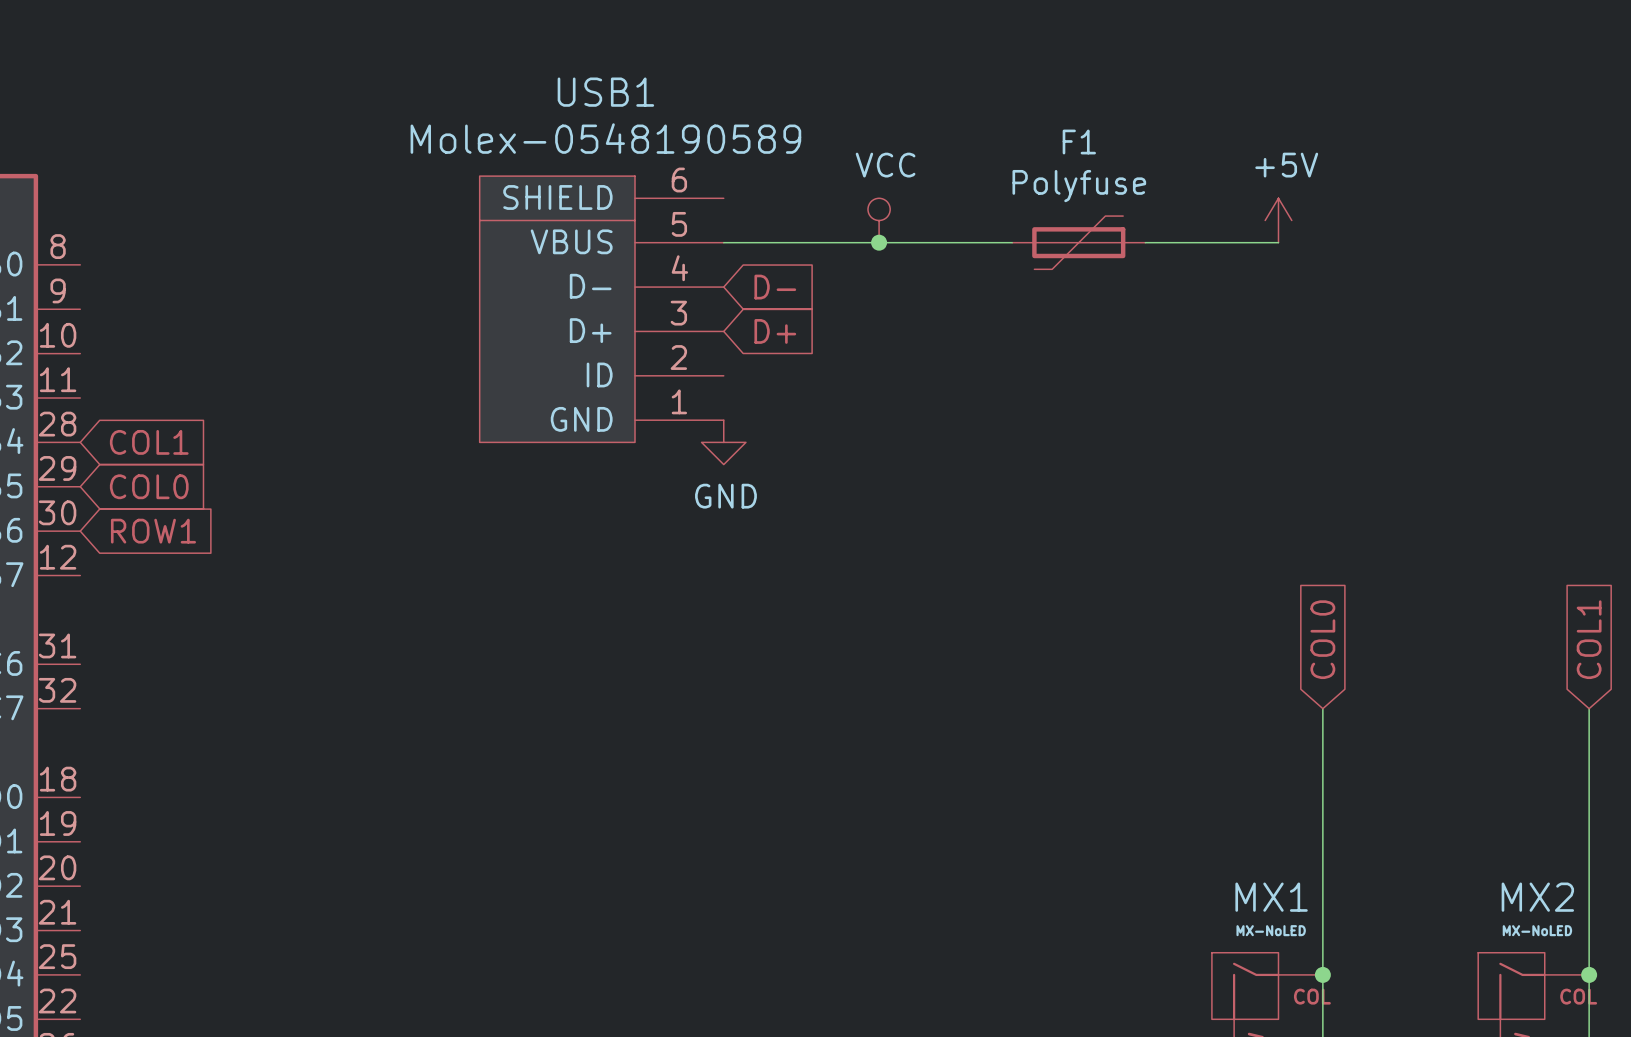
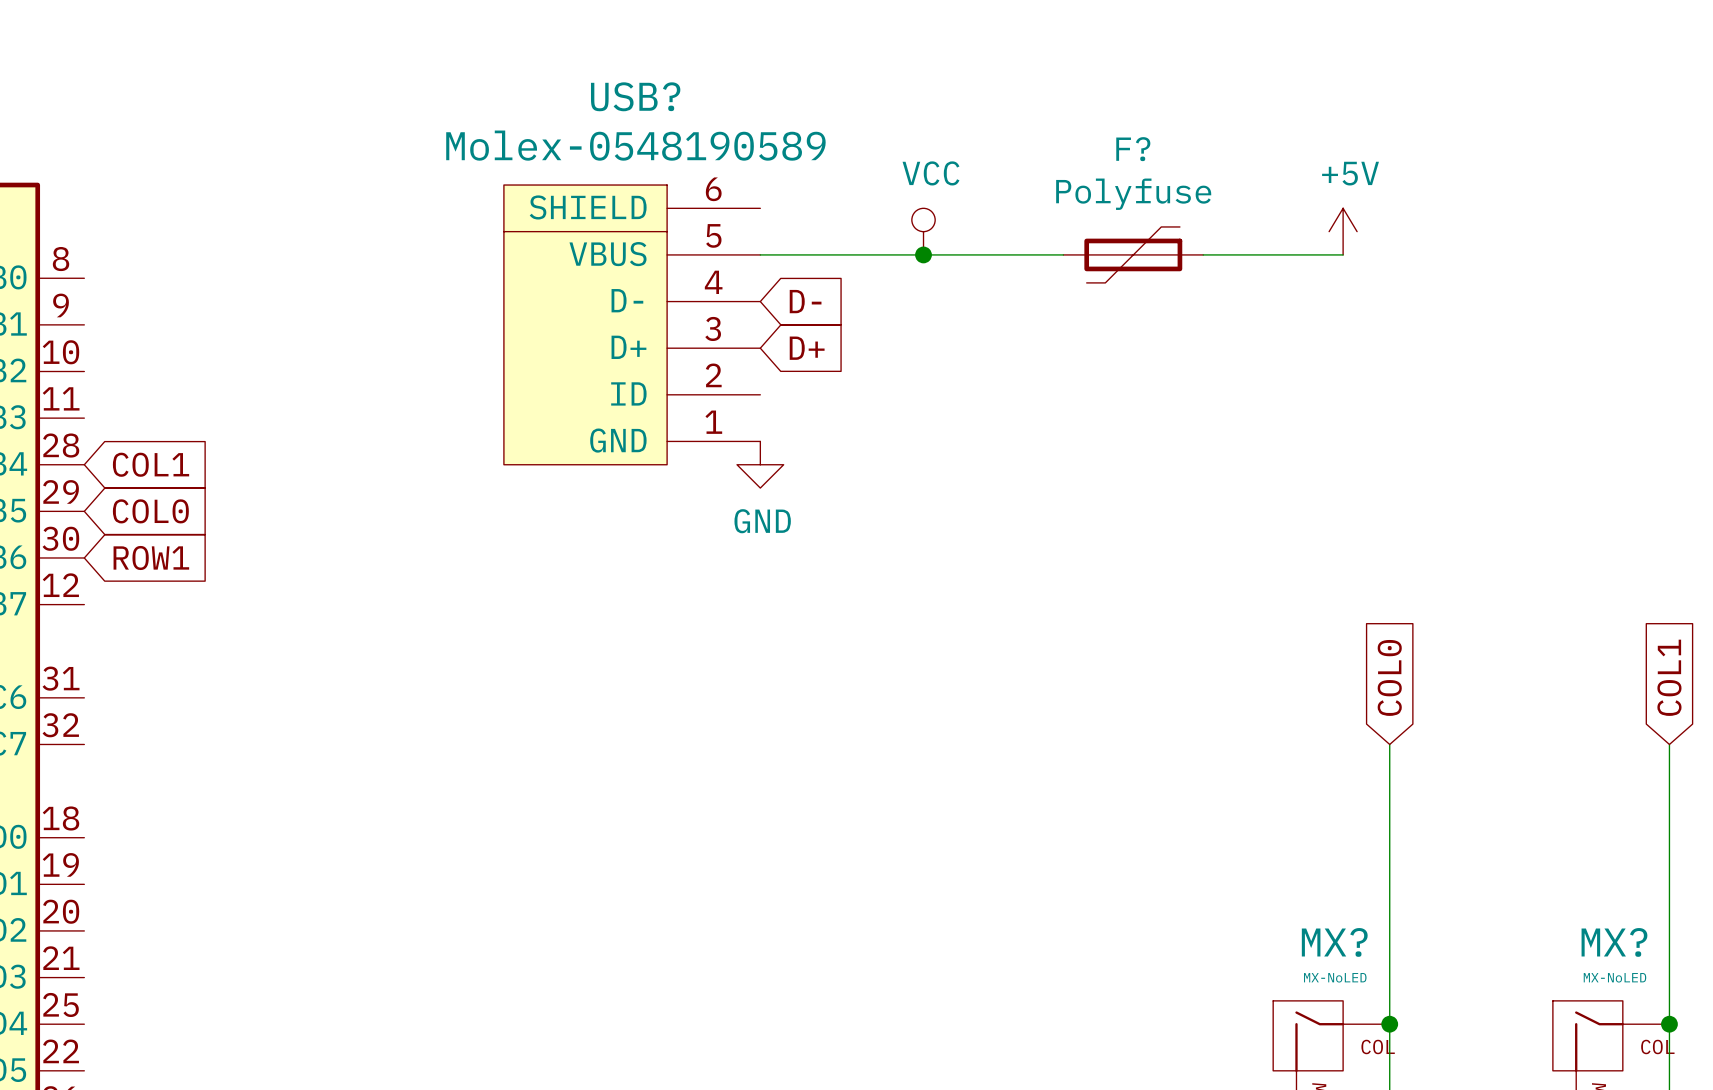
USB1 name: USB1 (605, 92) -> USB? (635, 96)
F1 name: F1 (1079, 142) -> F? (1133, 149)
MX1 name: MX1 (1271, 897) -> MX? (1334, 942)
MX2 name: MX2 (1537, 897) -> MX? (1614, 942)

